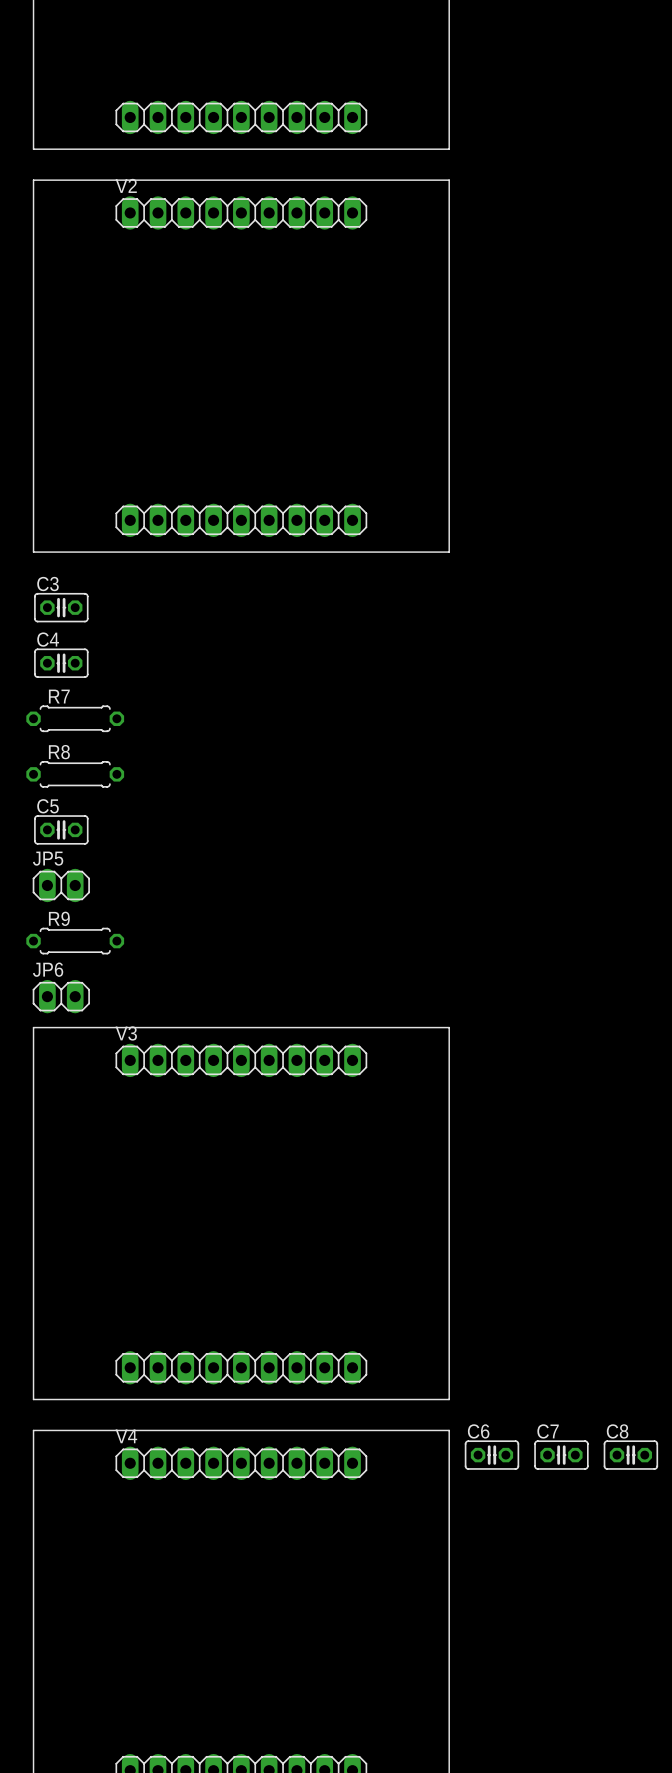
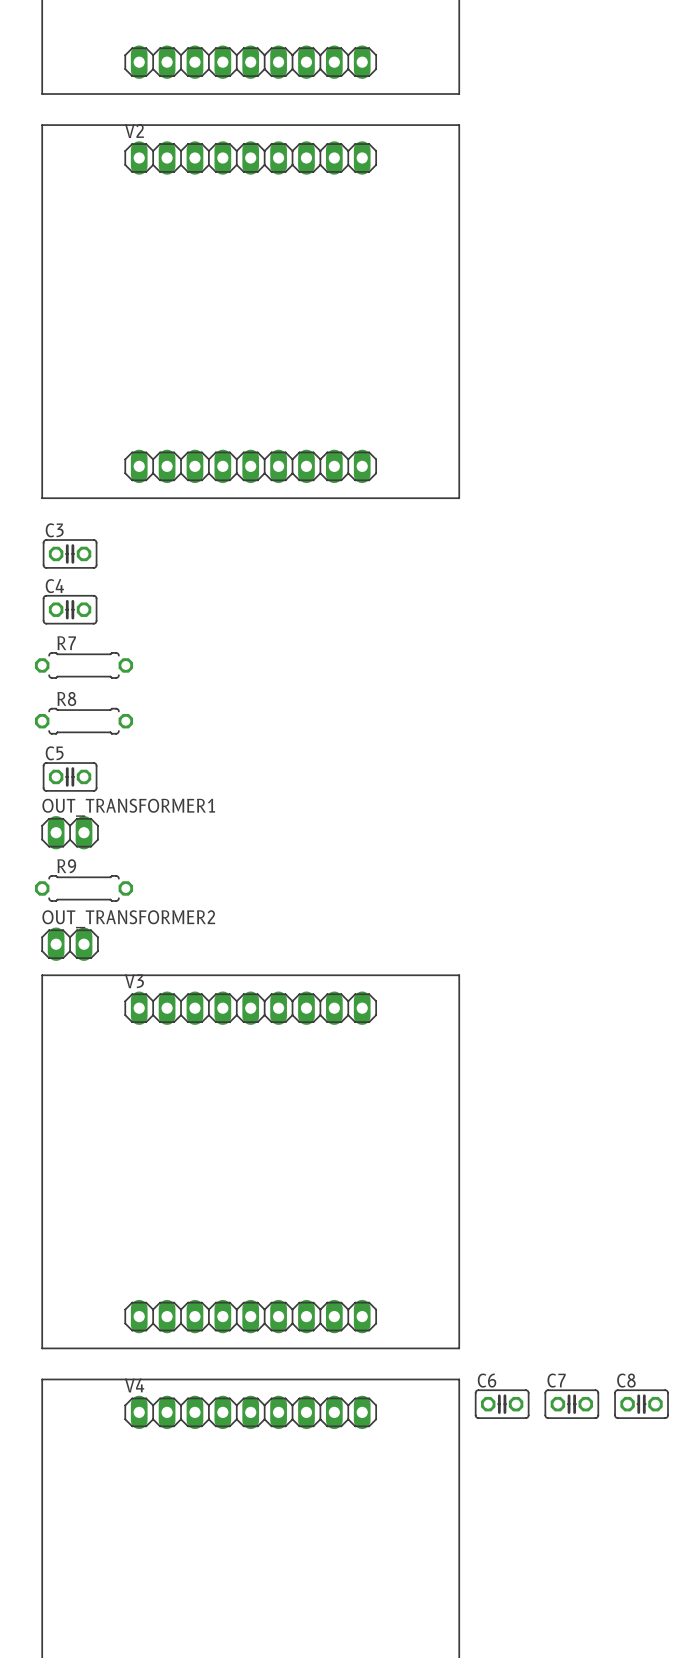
JP5 name: JP5 (48, 858) -> OUT_TRANSFORMER1 (128, 807)
JP6 name: JP6 (48, 969) -> OUT_TRANSFORMER2 (128, 919)

